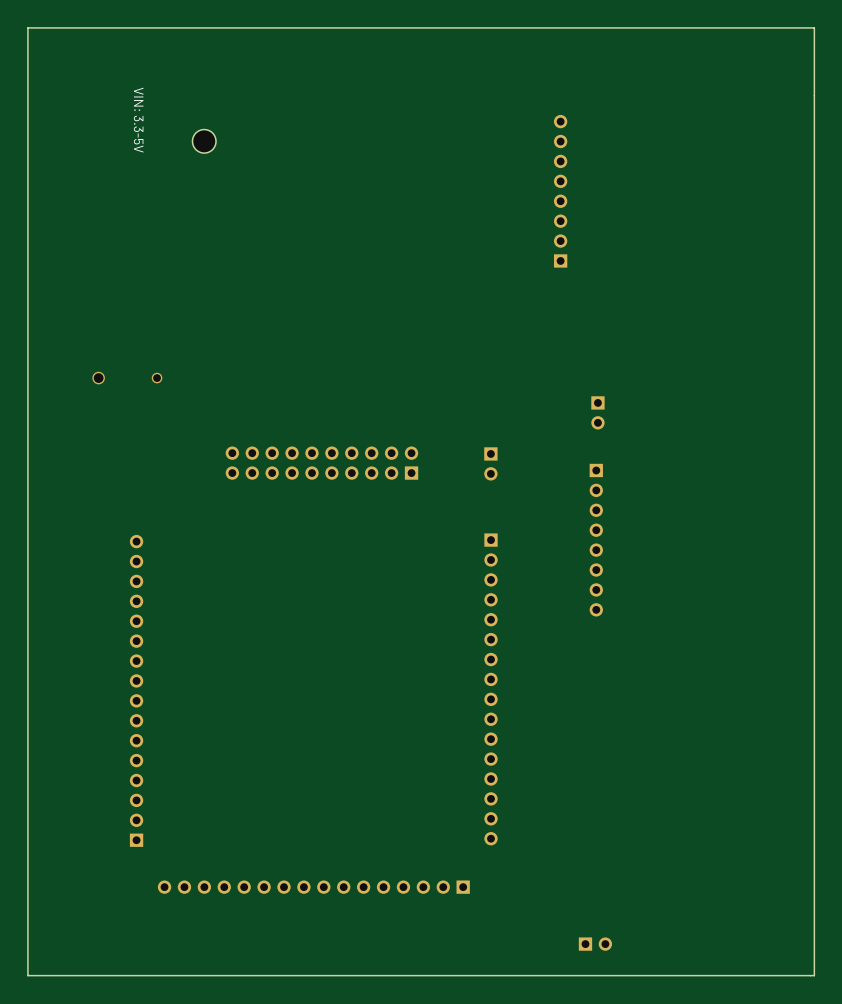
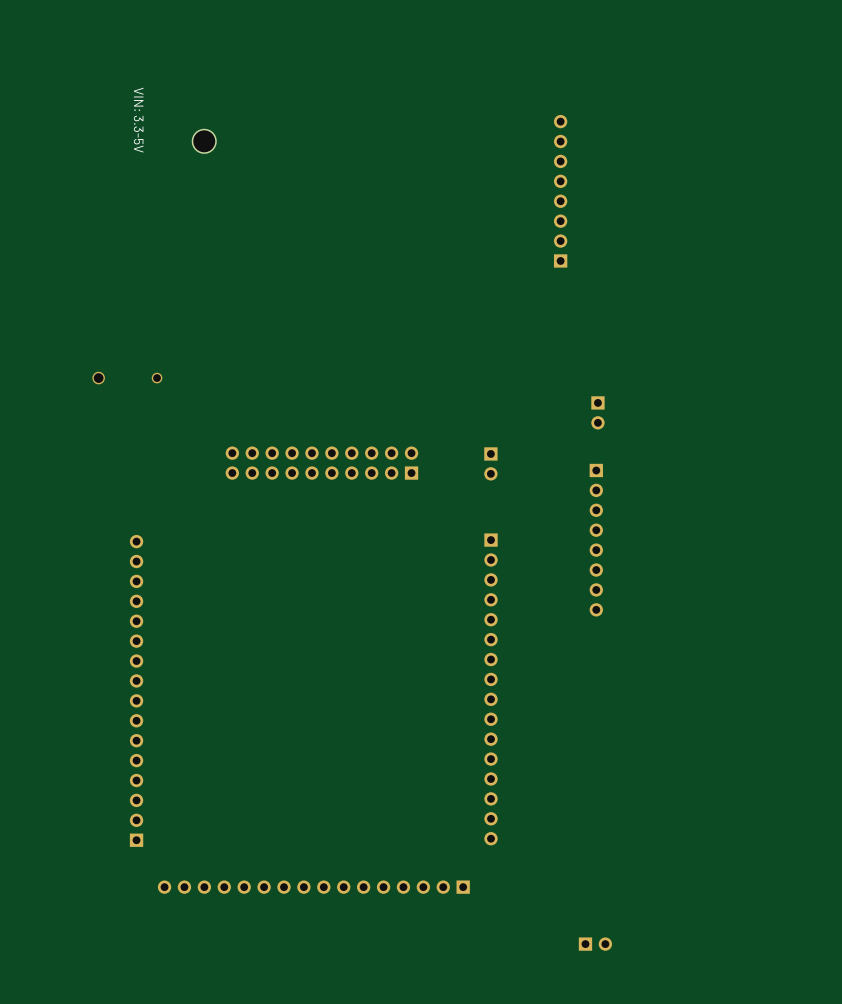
board edge: (814, 27) (27, 27) (27, 975) (814, 975) (814, 27) -> none

